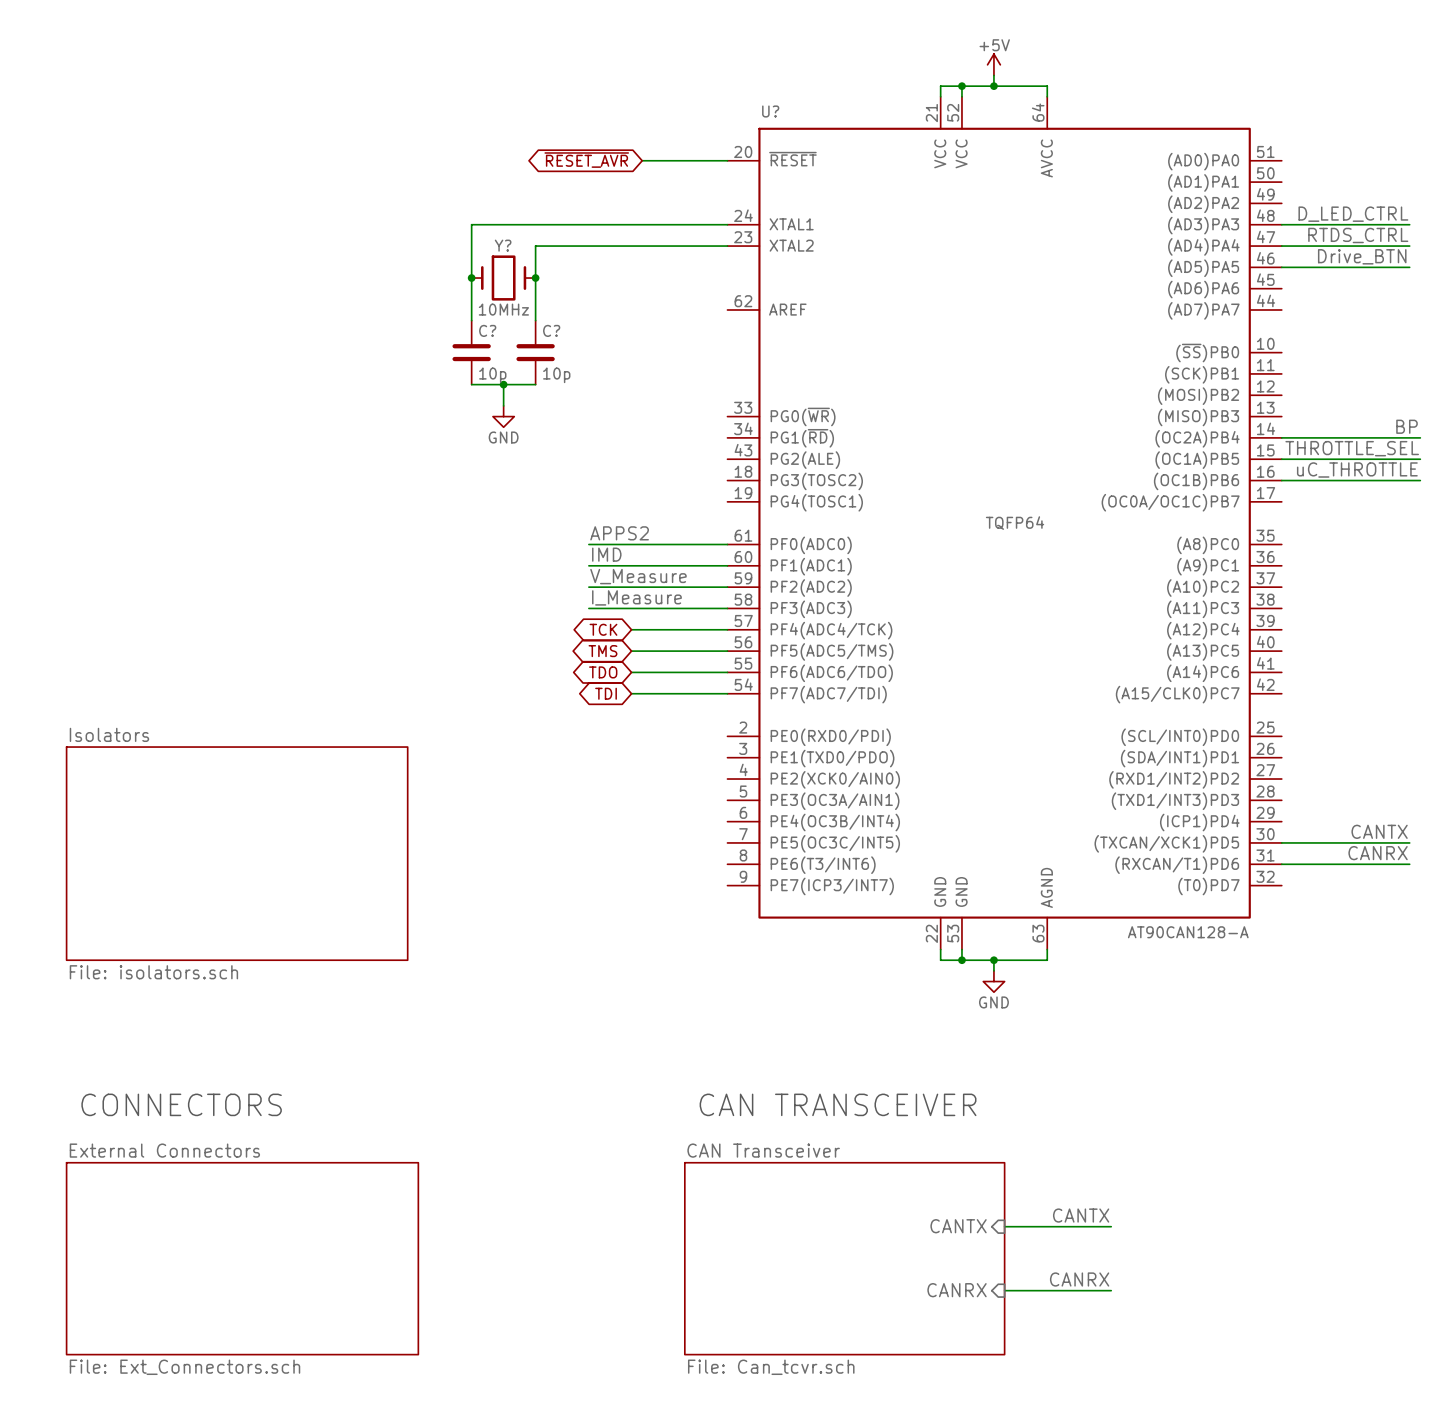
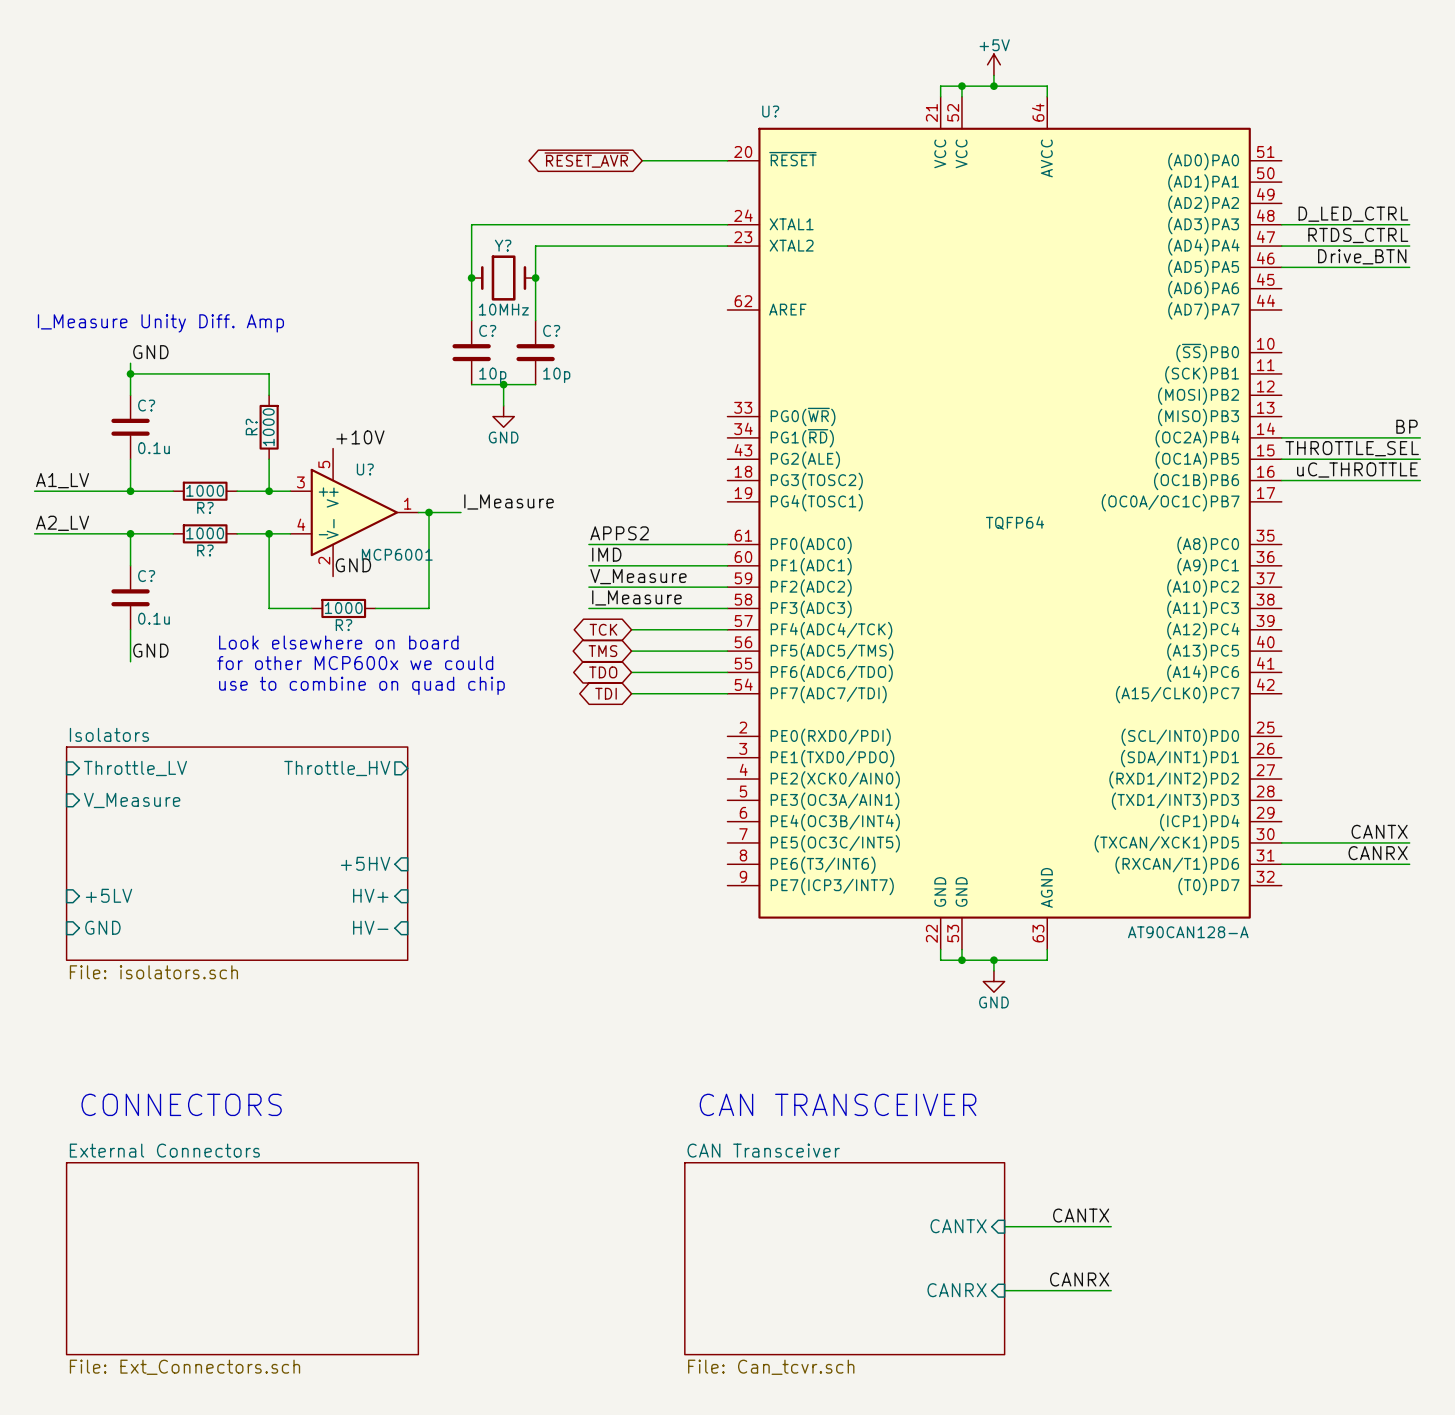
text: none -> I_Measure Unity Diff. Amp (160, 323)
label: none -> GND (150, 352)
wire: none -> (130, 363) (130, 395)
wire: none -> (130, 373) (269, 373) (269, 395)
junction: none -> (130, 373)
C?: none -> 0.1u (130, 427)
R?: none -> 1000 (269, 427)
label: none -> +10V (360, 437)
wire: none -> (130, 459) (130, 491)
wire: none -> (269, 459) (269, 491)
label: none -> A1_LV (62, 480)
wire: none -> (34, 491) (173, 491)
junction: none -> (130, 491)
R?: none -> 1000 (205, 491)
wire: none -> (237, 491) (290, 491)
junction: none -> (269, 491)
label: none -> I_Measure (509, 501)
U?: none -> MCP6001 (354, 512)
wire: none -> (418, 512) (460, 512)
wire: none -> (429, 512) (429, 608) (375, 608)
junction: none -> (429, 512)
label: none -> A2_LV (62, 523)
wire: none -> (34, 533) (173, 533)
wire: none -> (130, 533) (130, 565)
junction: none -> (130, 533)
R?: none -> 1000 (205, 533)
wire: none -> (237, 533) (290, 533)
wire: none -> (269, 533) (269, 608) (311, 608)
junction: none -> (269, 533)
label: none -> GND (353, 565)
C?: none -> 0.1u (130, 597)
R?: none -> 1000 (343, 608)
wire: none -> (130, 629) (130, 661)
text: none -> Look elsewhere on board (338, 642)
label: none -> GND (150, 650)
text: none -> for other MCP600x we could (355, 663)
text: none -> use to combine on quad chip (361, 685)
sheet pin: none -> Throttle_LV (135, 768)
sheet pin: none -> Throttle_HV (337, 768)
sheet pin: none -> V_Measure (132, 800)
sheet pin: none -> +5HV (365, 863)
sheet pin: none -> +5LV (109, 895)
sheet pin: none -> HV+ (370, 895)
sheet pin: none -> GND (102, 927)
sheet pin: none -> HV- (370, 927)

